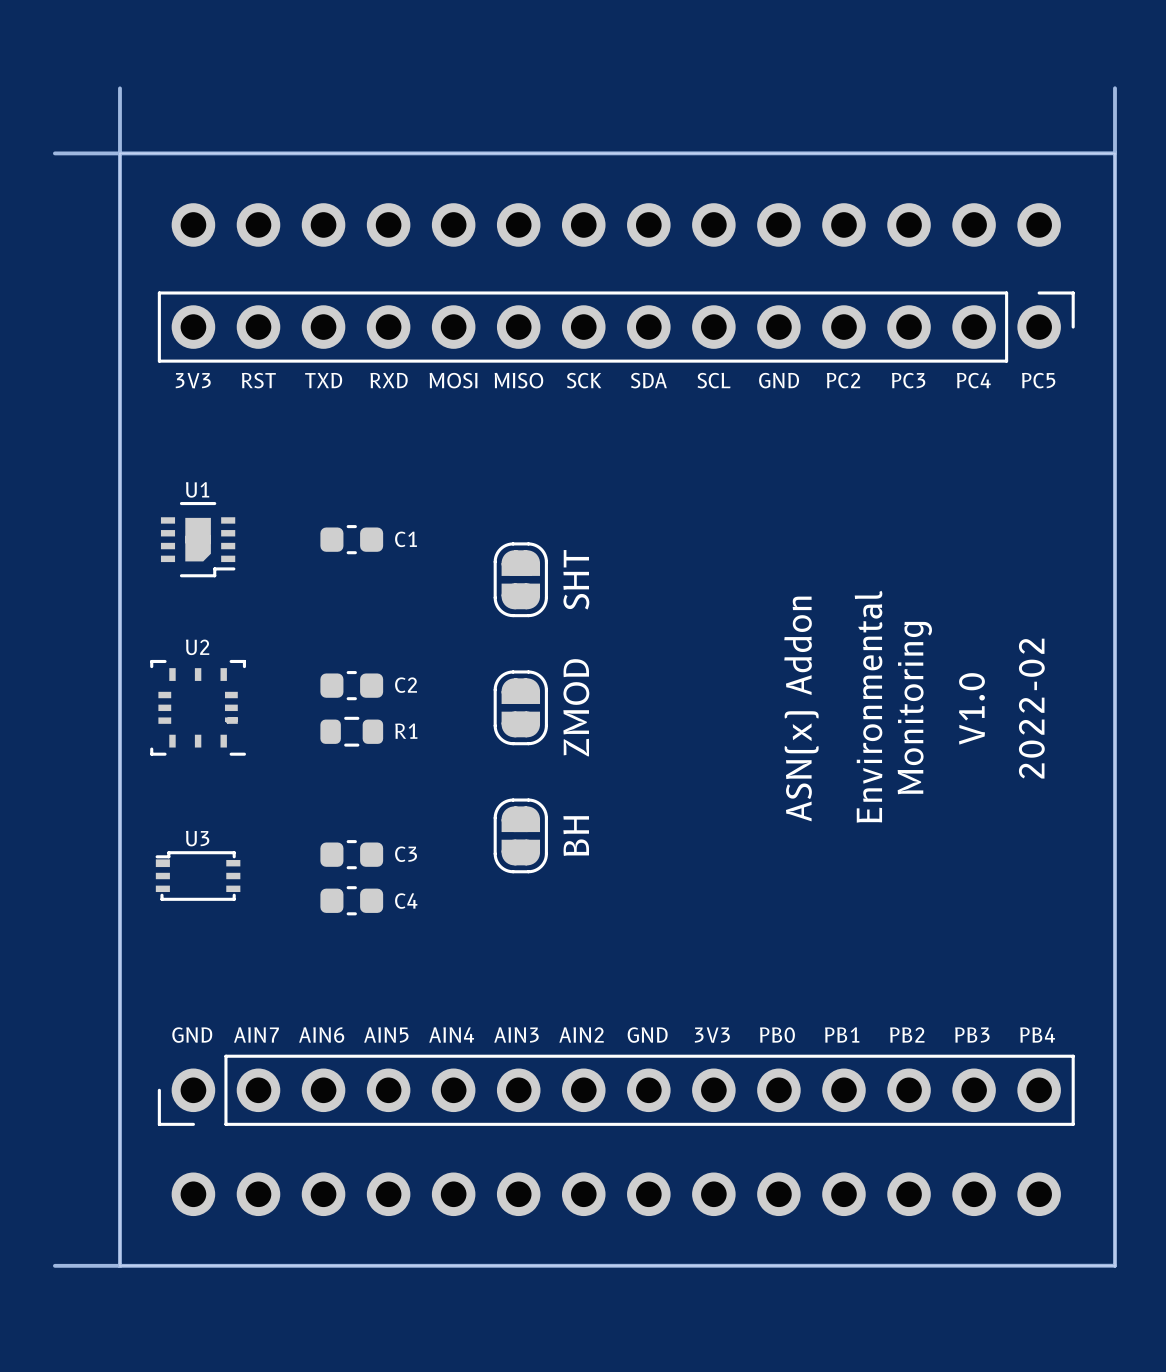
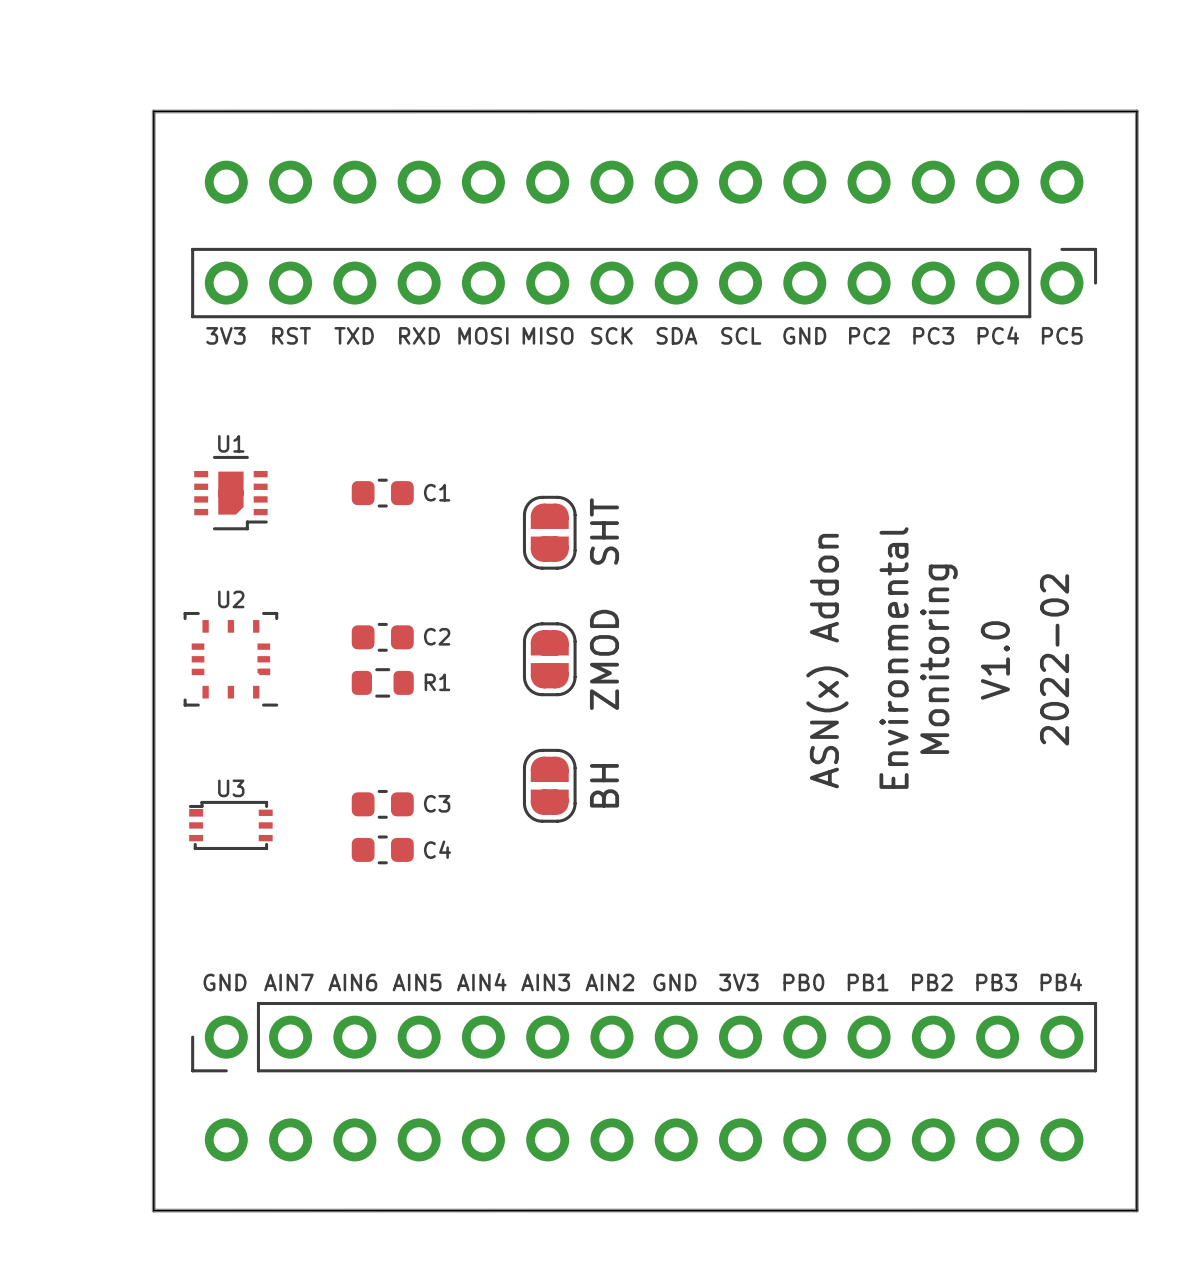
line: (119, 88) (119, 153) (54, 153) -> none
line: (1115, 88) (1115, 153) -> none
line: (54, 1265) (119, 1265) -> none

